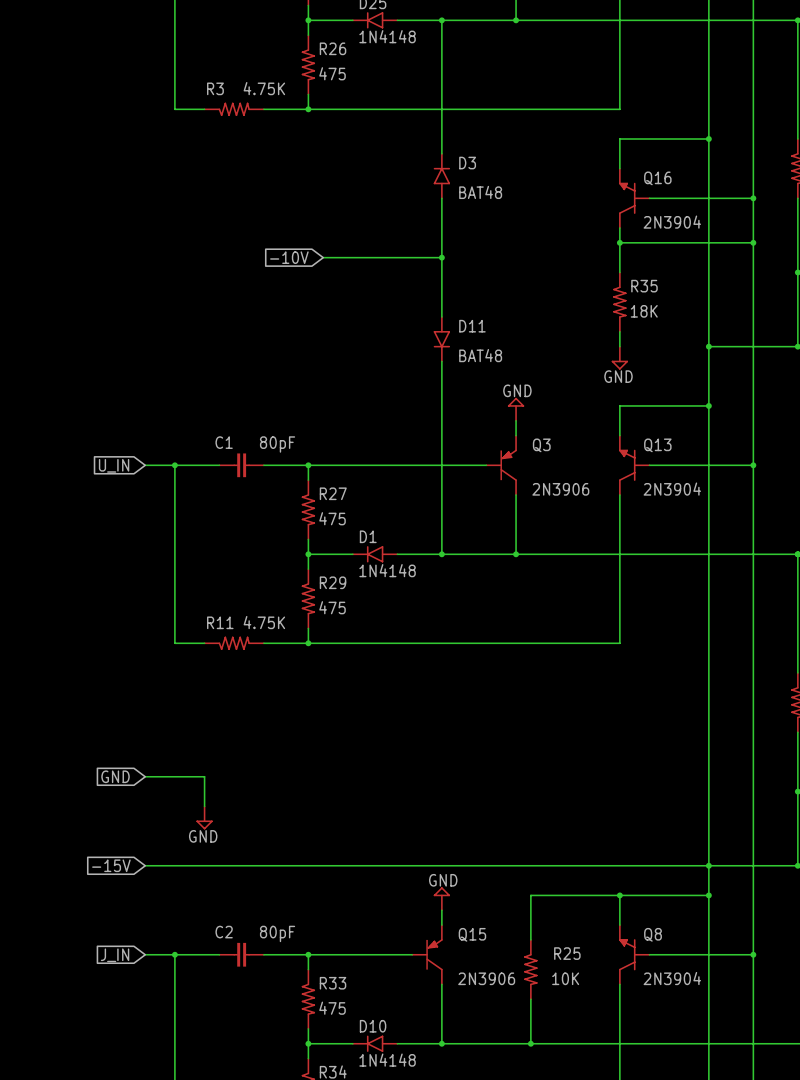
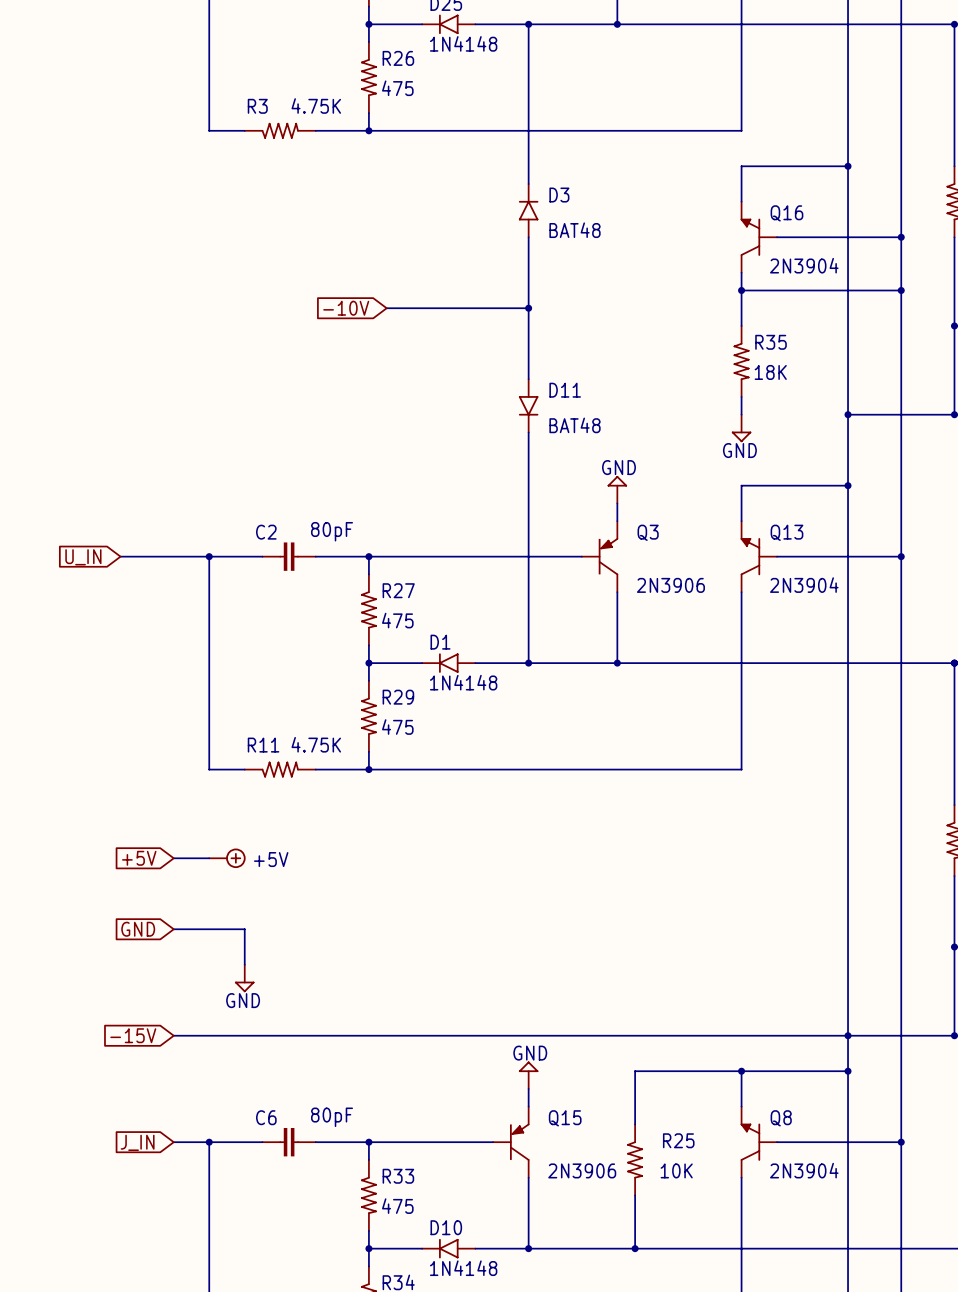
C1 name: C1 (224, 442) -> C2 (266, 532)
wire: none -> (120, 556) (173, 556)
global label position: U_IN (114, 465) -> U_IN (83, 557)
global label: none -> +5V (139, 858)
wire: none -> (173, 858) (209, 858)
power symbol: none -> +5V (227, 858)
C2 name: C2 (224, 932) -> C6 (266, 1117)

